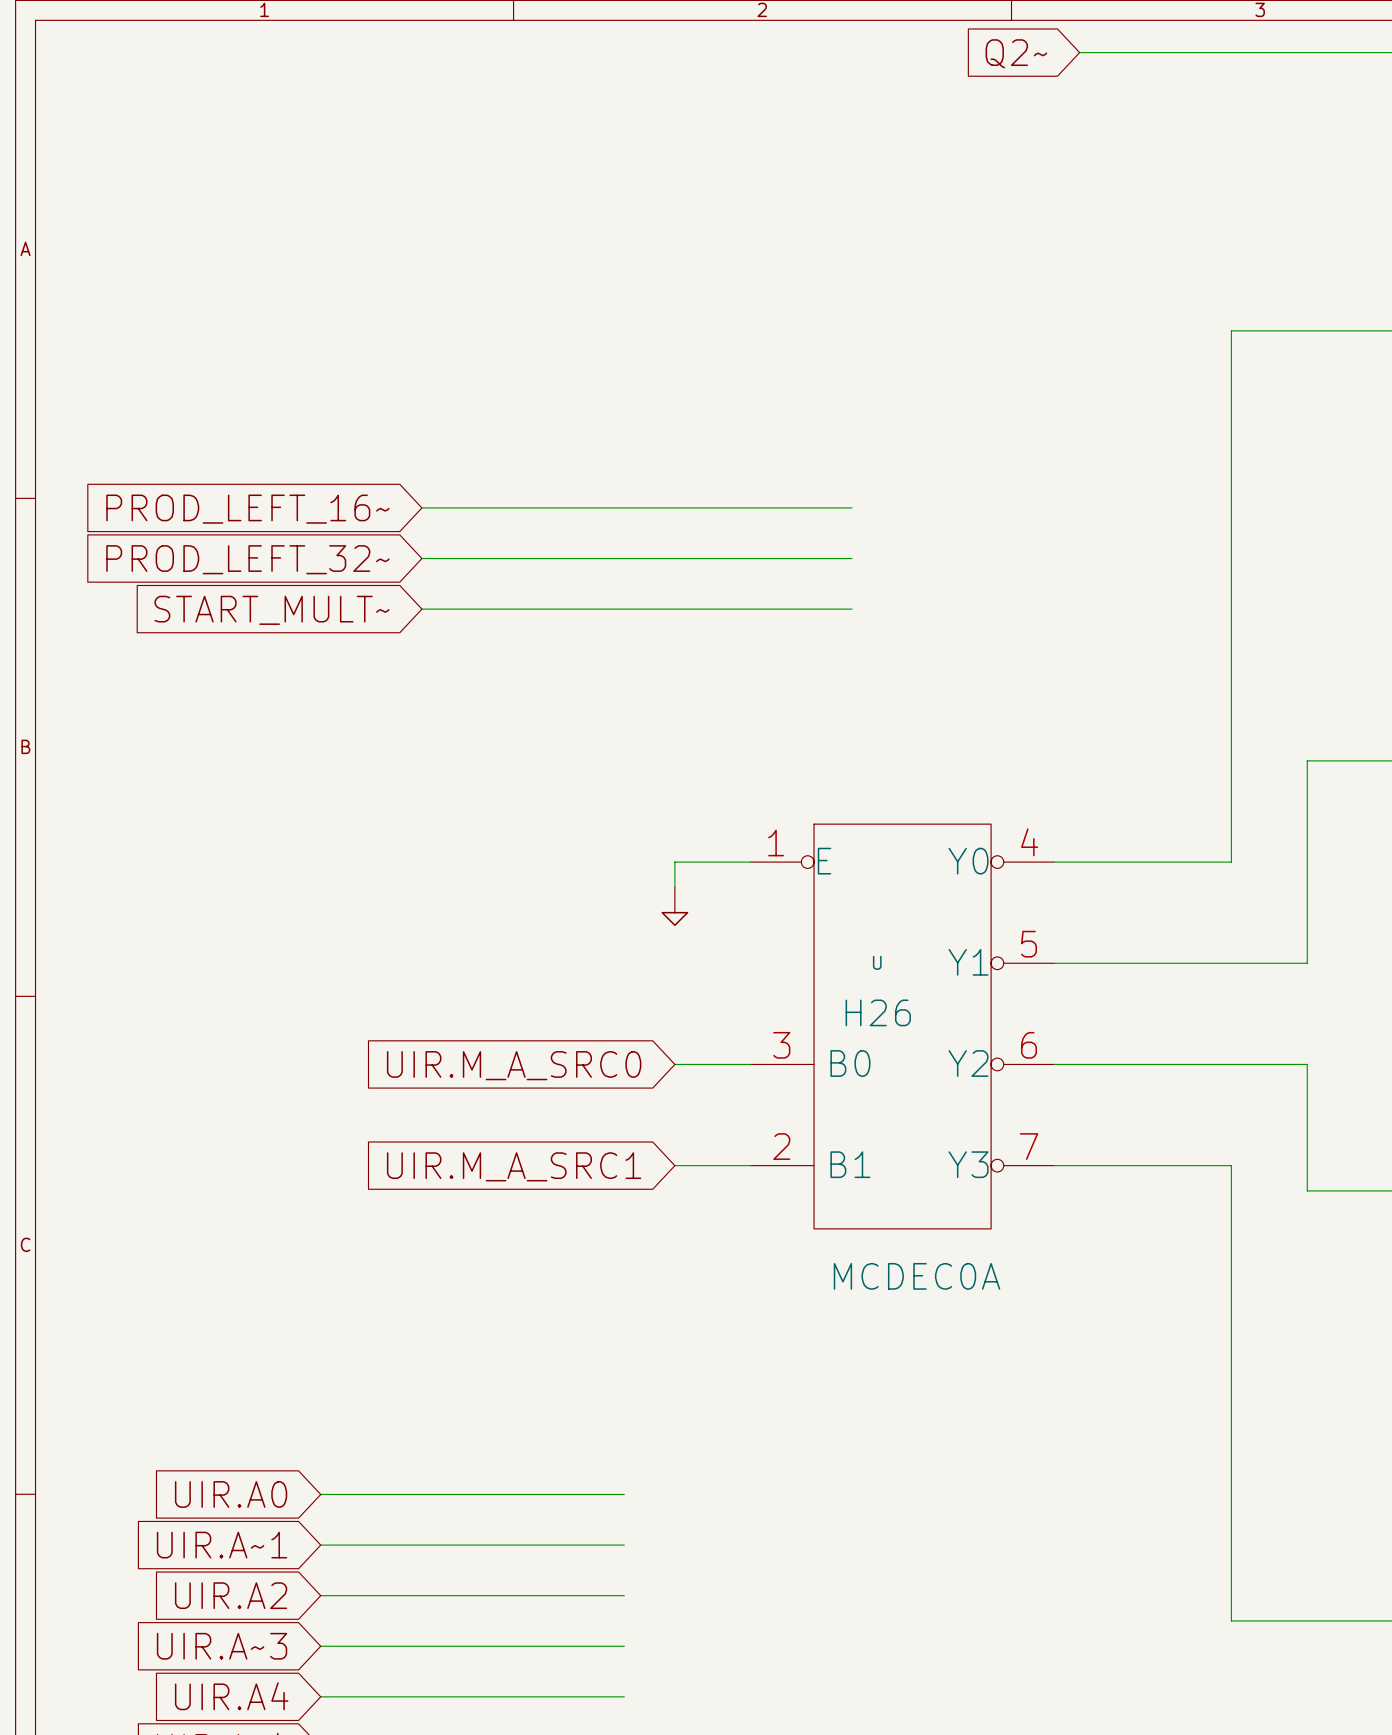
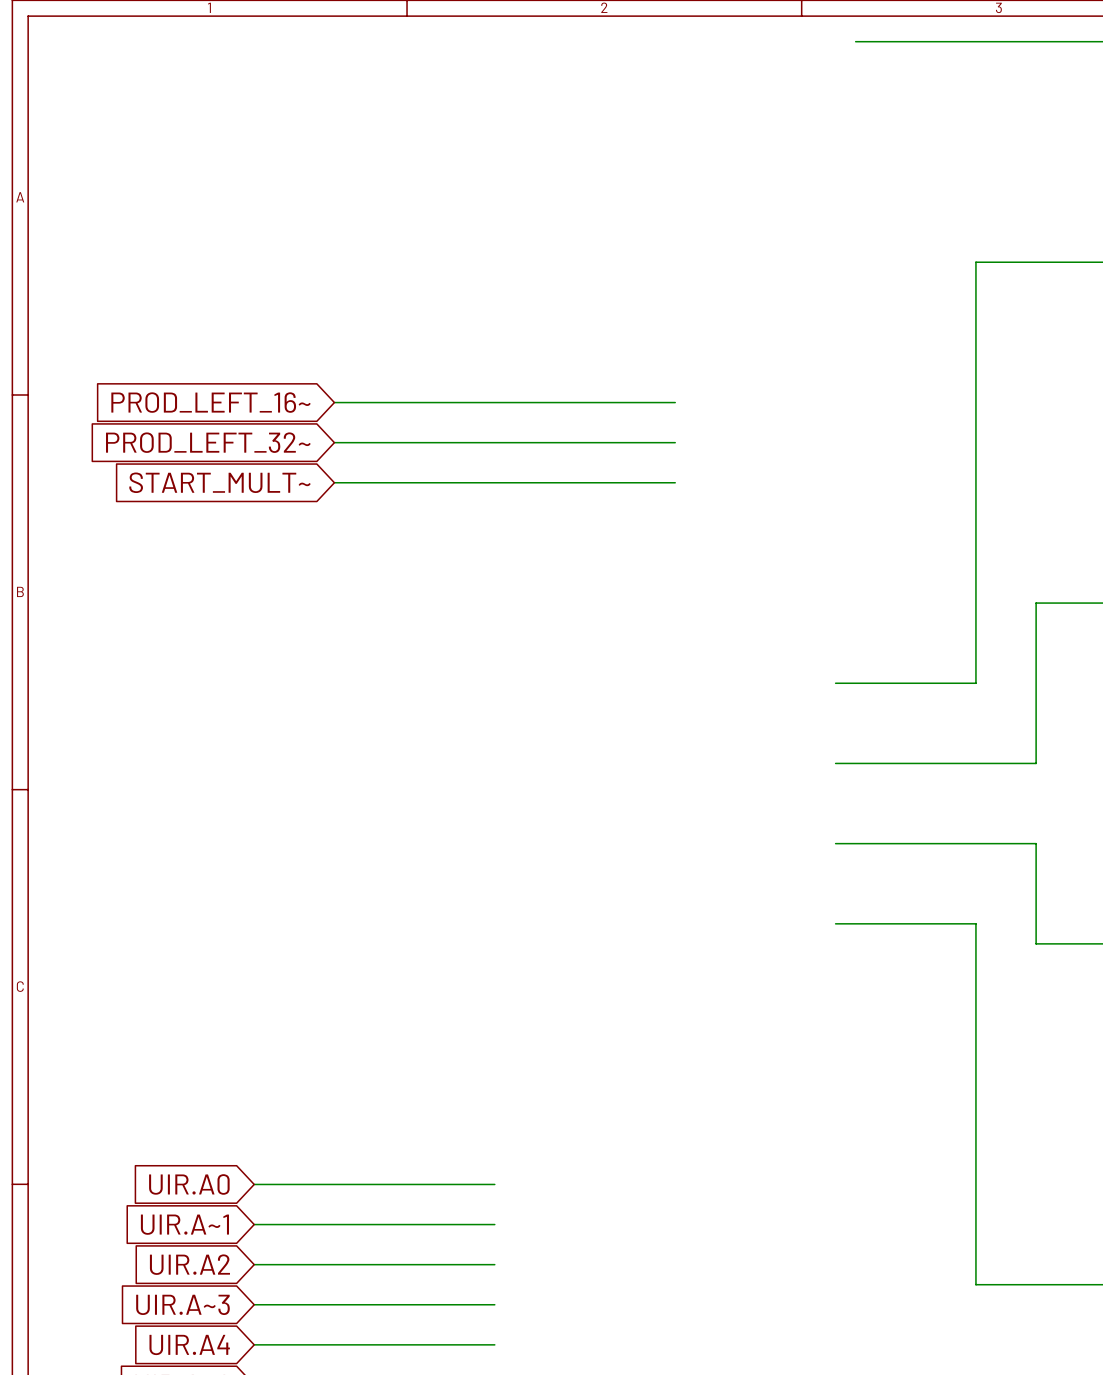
global label: Q2~ (1016, 53) -> none
wire: (750, 862) (674, 862) (674, 887) -> none
power symbol: (674, 906) -> none
U: (902, 1026) -> none
wire: (674, 1064) (750, 1064) -> none
global label: UIR.M_A_SRC0 (514, 1065) -> none
wire: (674, 1165) (750, 1165) -> none
global label: UIR.M_A_SRC1 (514, 1166) -> none

